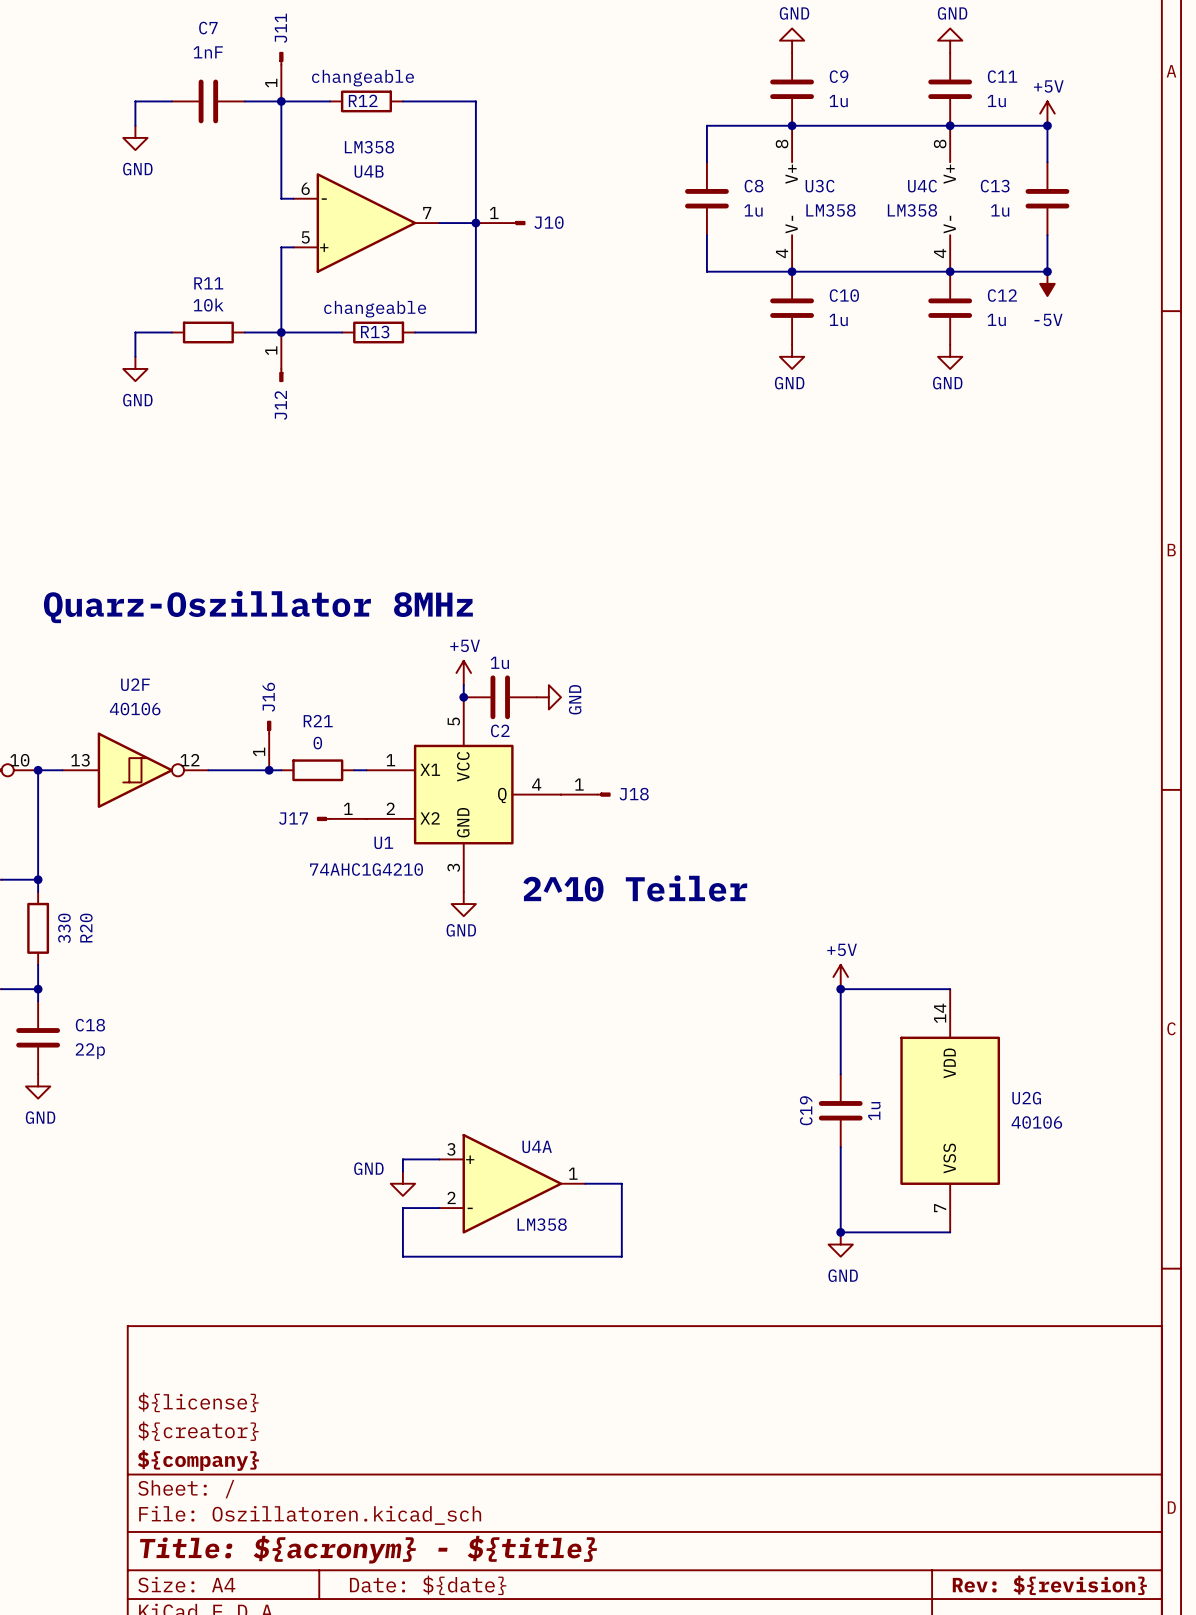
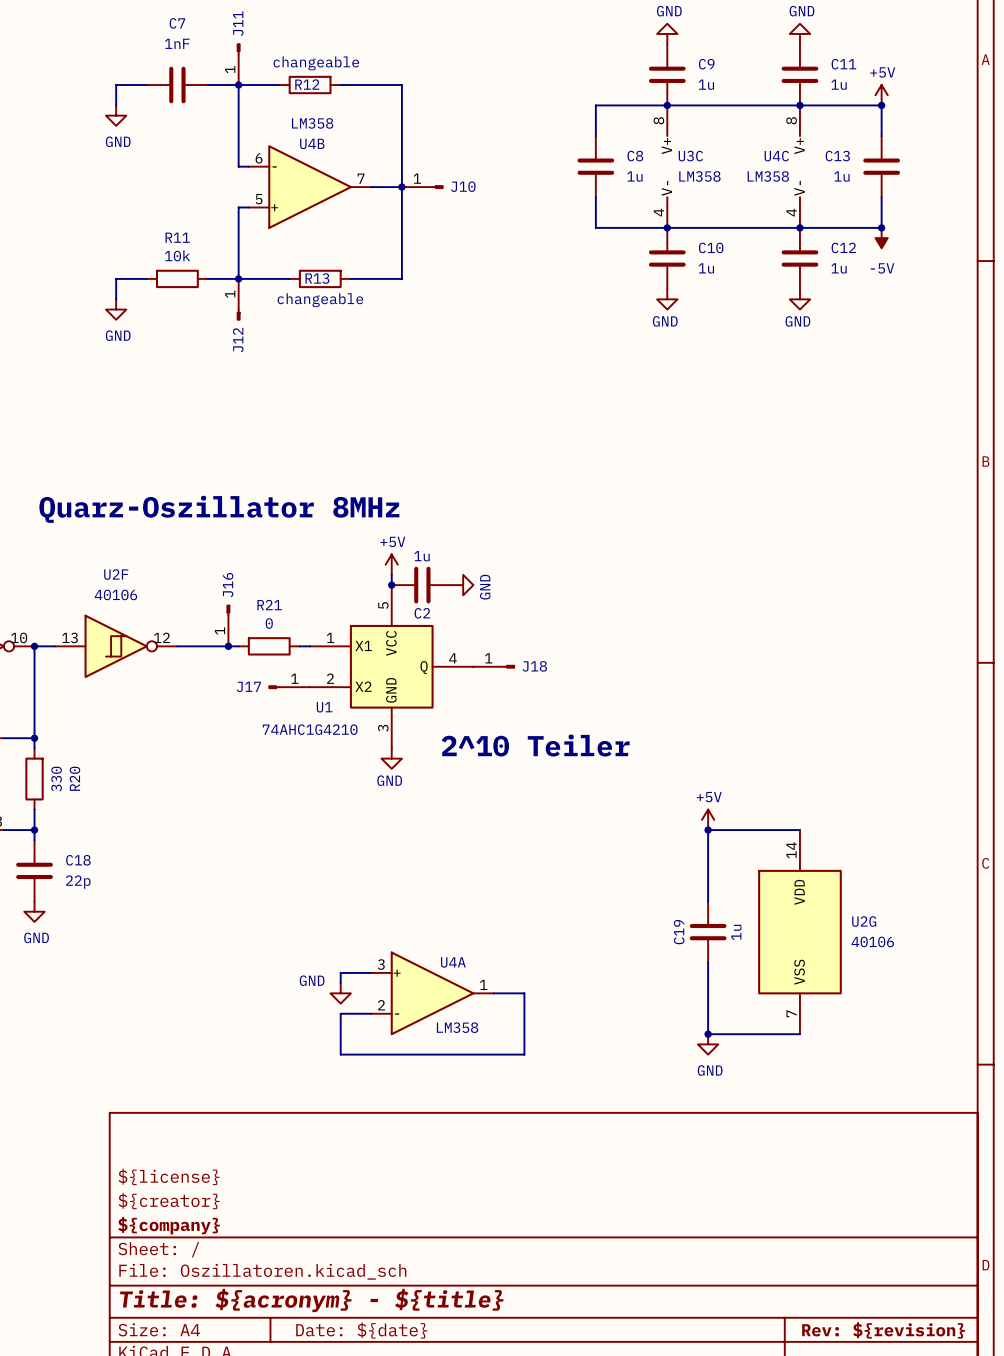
R12 text: none -> changeable (316, 63)
R12 value: changeable (362, 78) -> none
R13 value: changeable (375, 309) -> none
R13 text: none -> changeable (320, 300)

